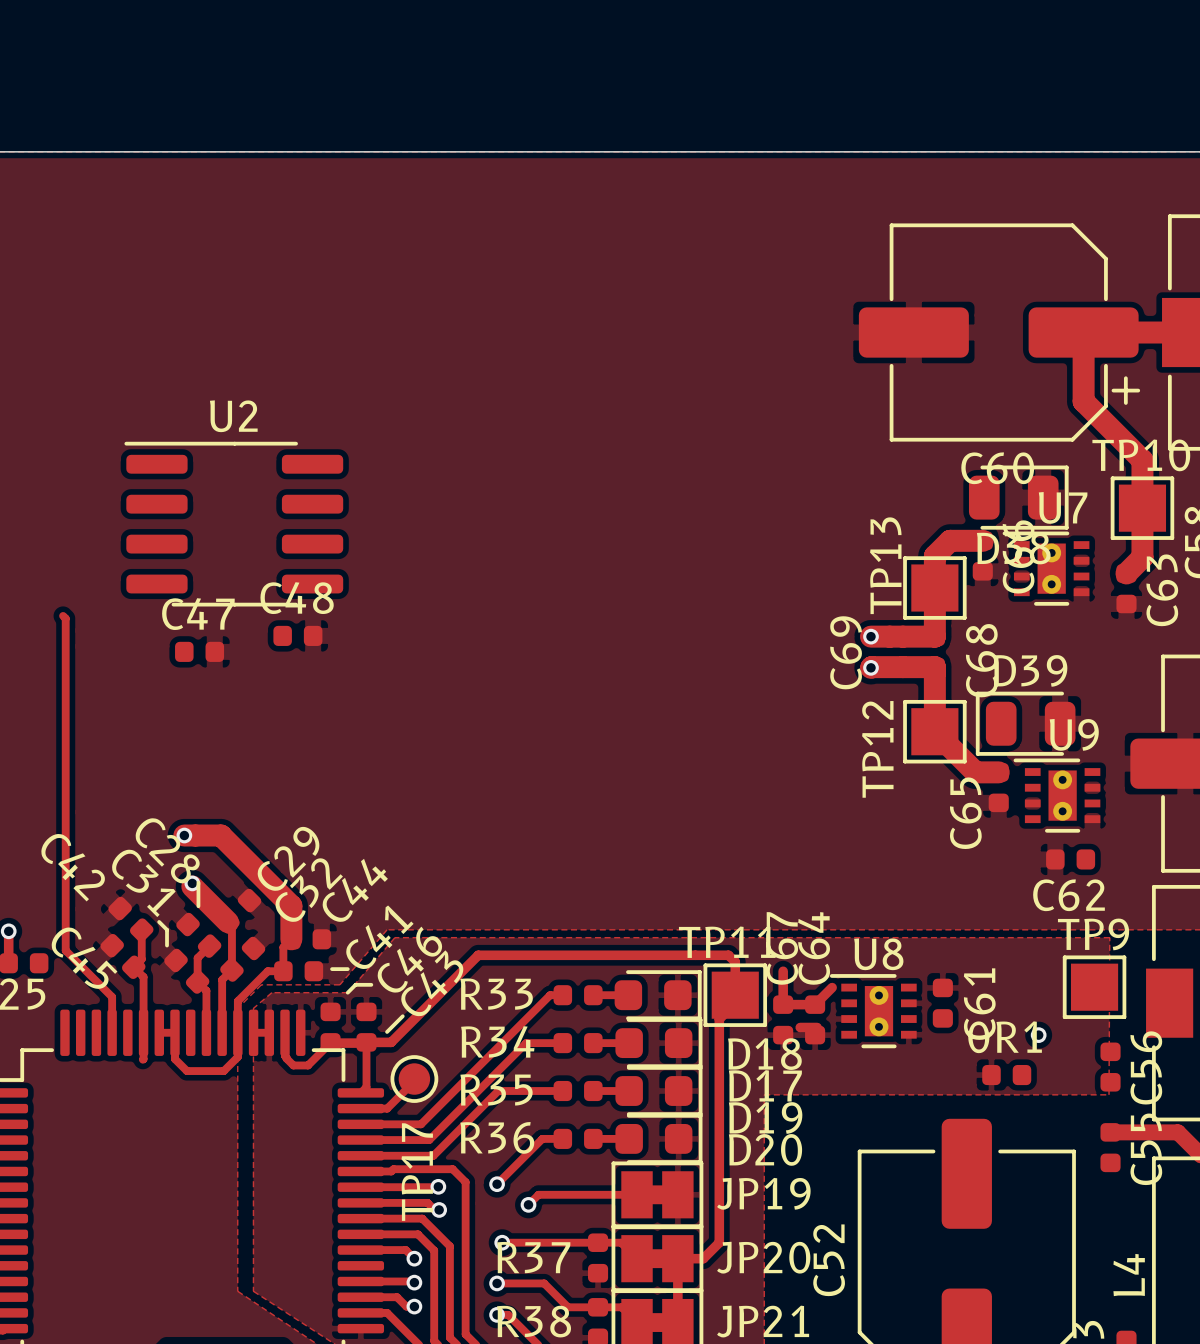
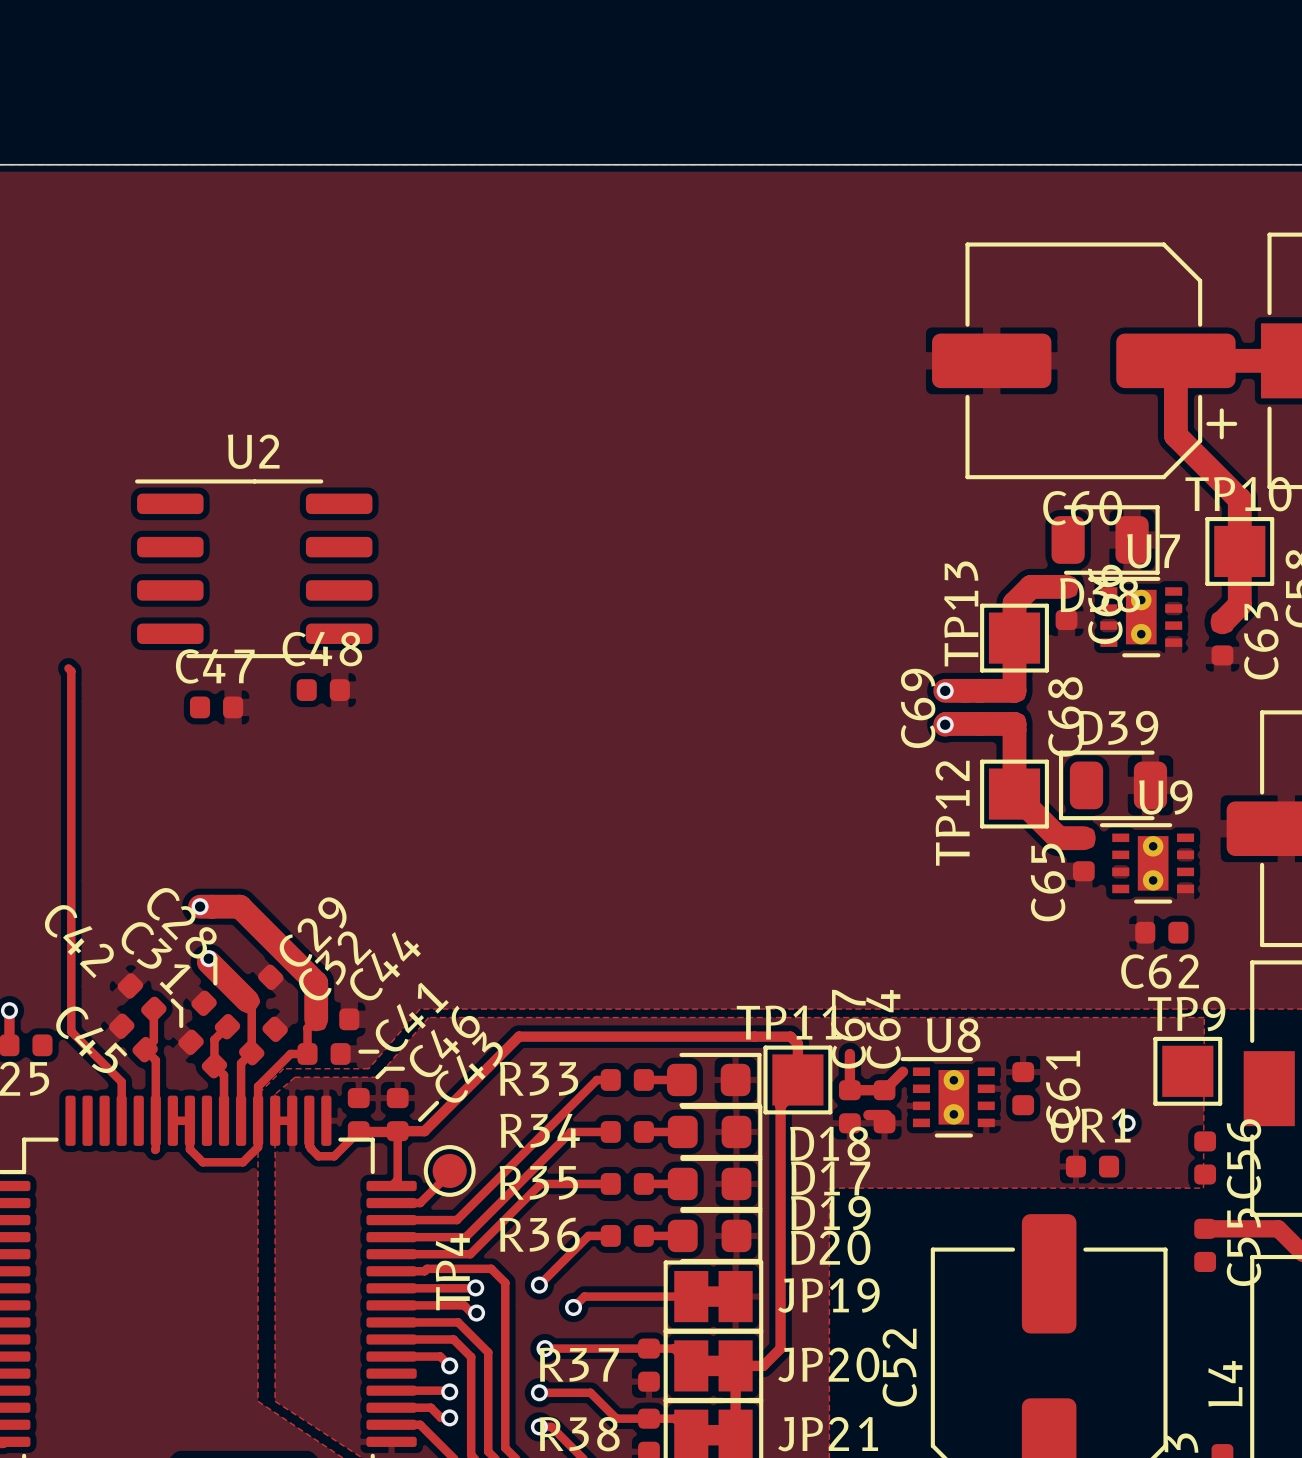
TP17 name: TP17 (417, 1172) -> TP4 (452, 1271)

